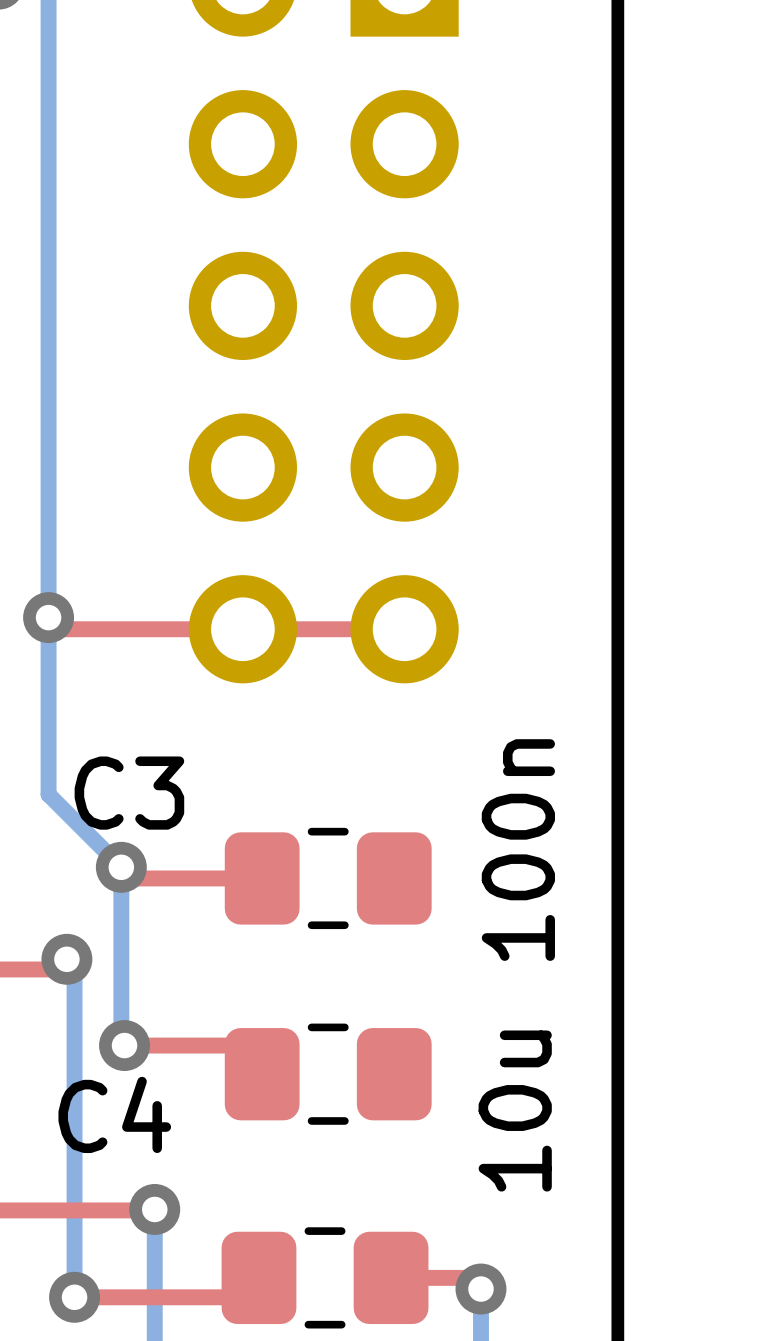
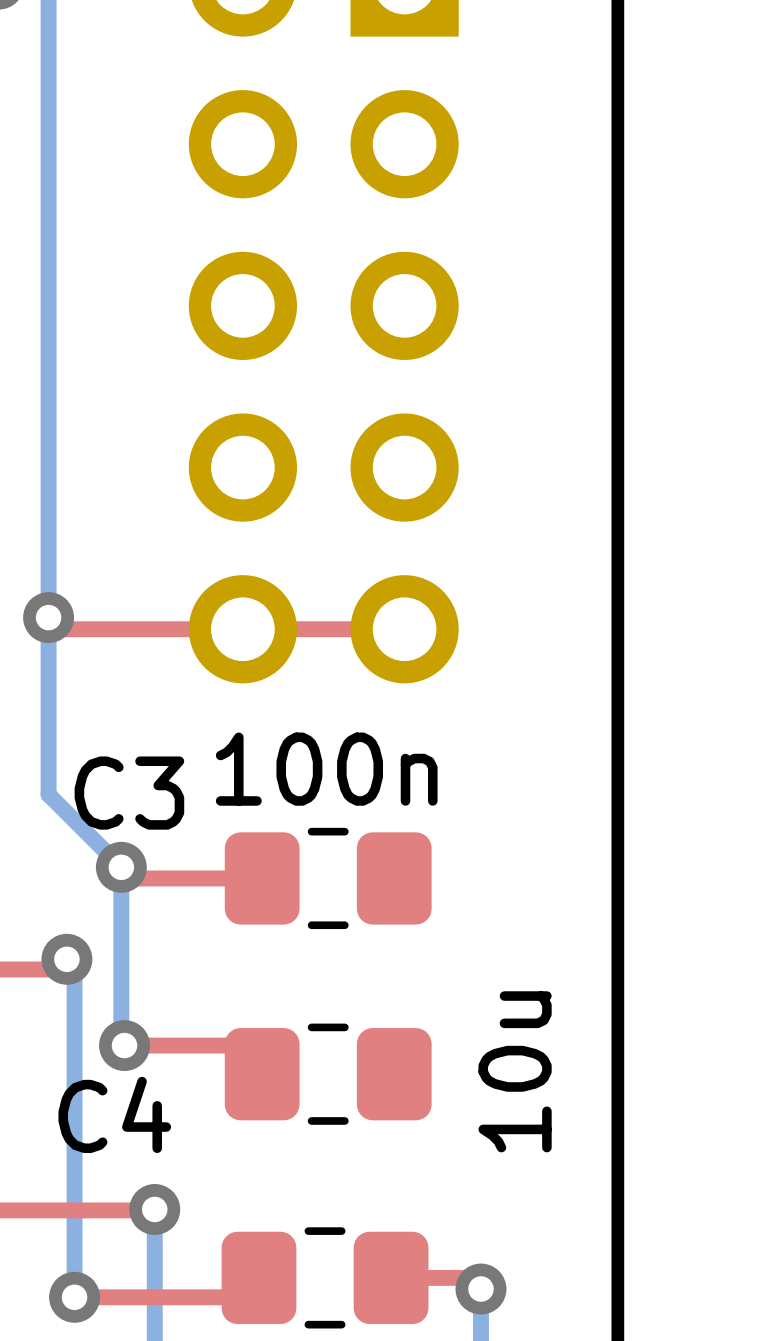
C3 value rotation: 0° (518, 850) -> 90° clockwise (326, 769)
C4 value position: 10u (515, 1111) -> 10u (515, 1071)

